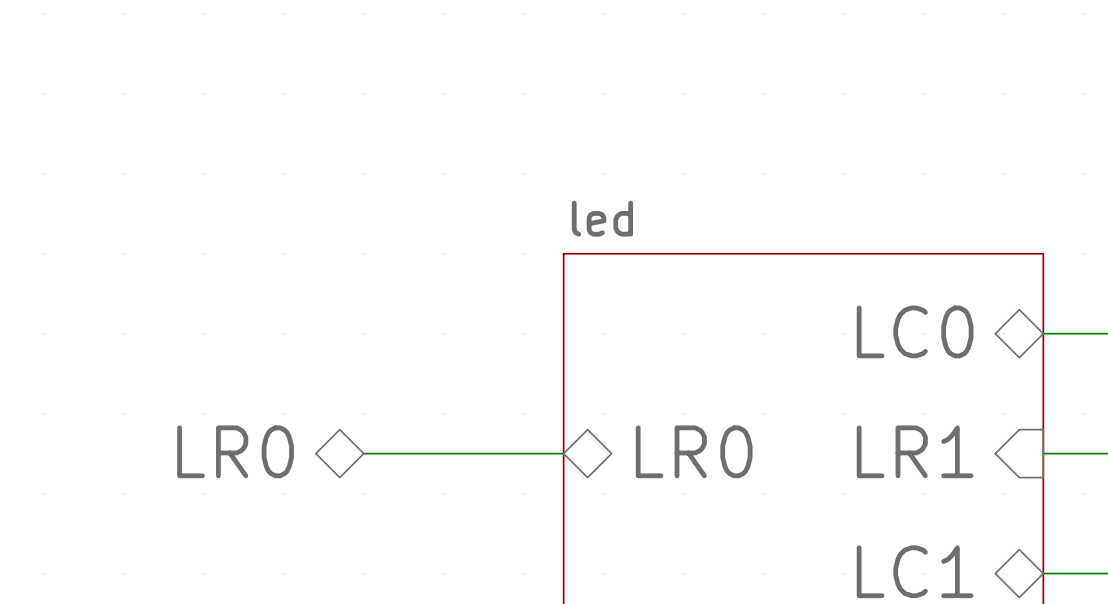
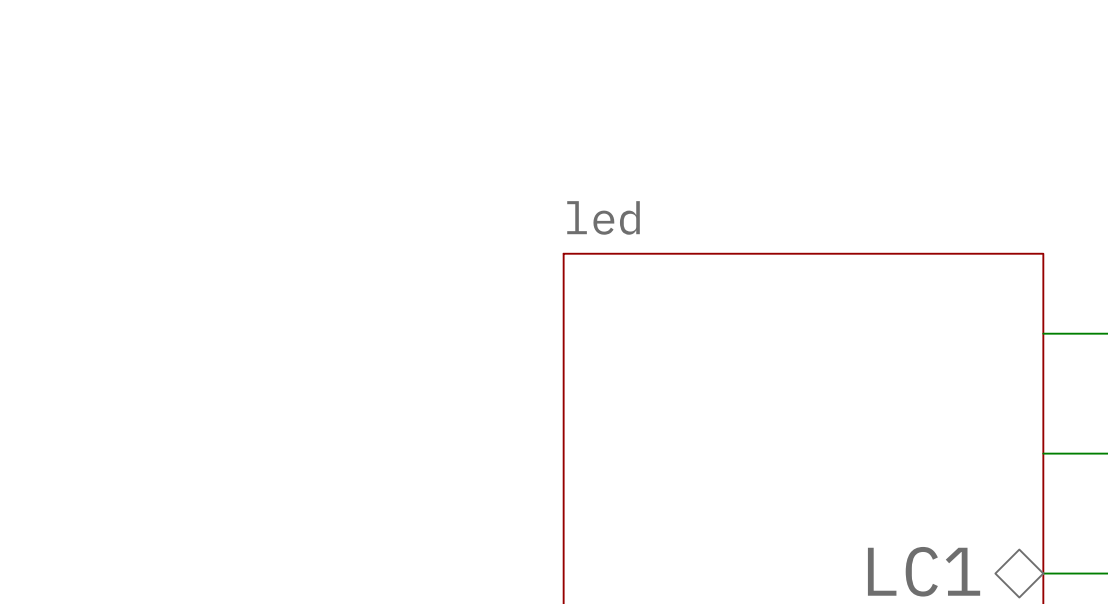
sheet pin: LC0 (915, 331) -> none
hierarchical label: LR0 (235, 451) -> none
sheet pin: LR0 (694, 451) -> none
sheet pin: LR1 (915, 451) -> none
wire: (363, 453) (563, 453) -> none

